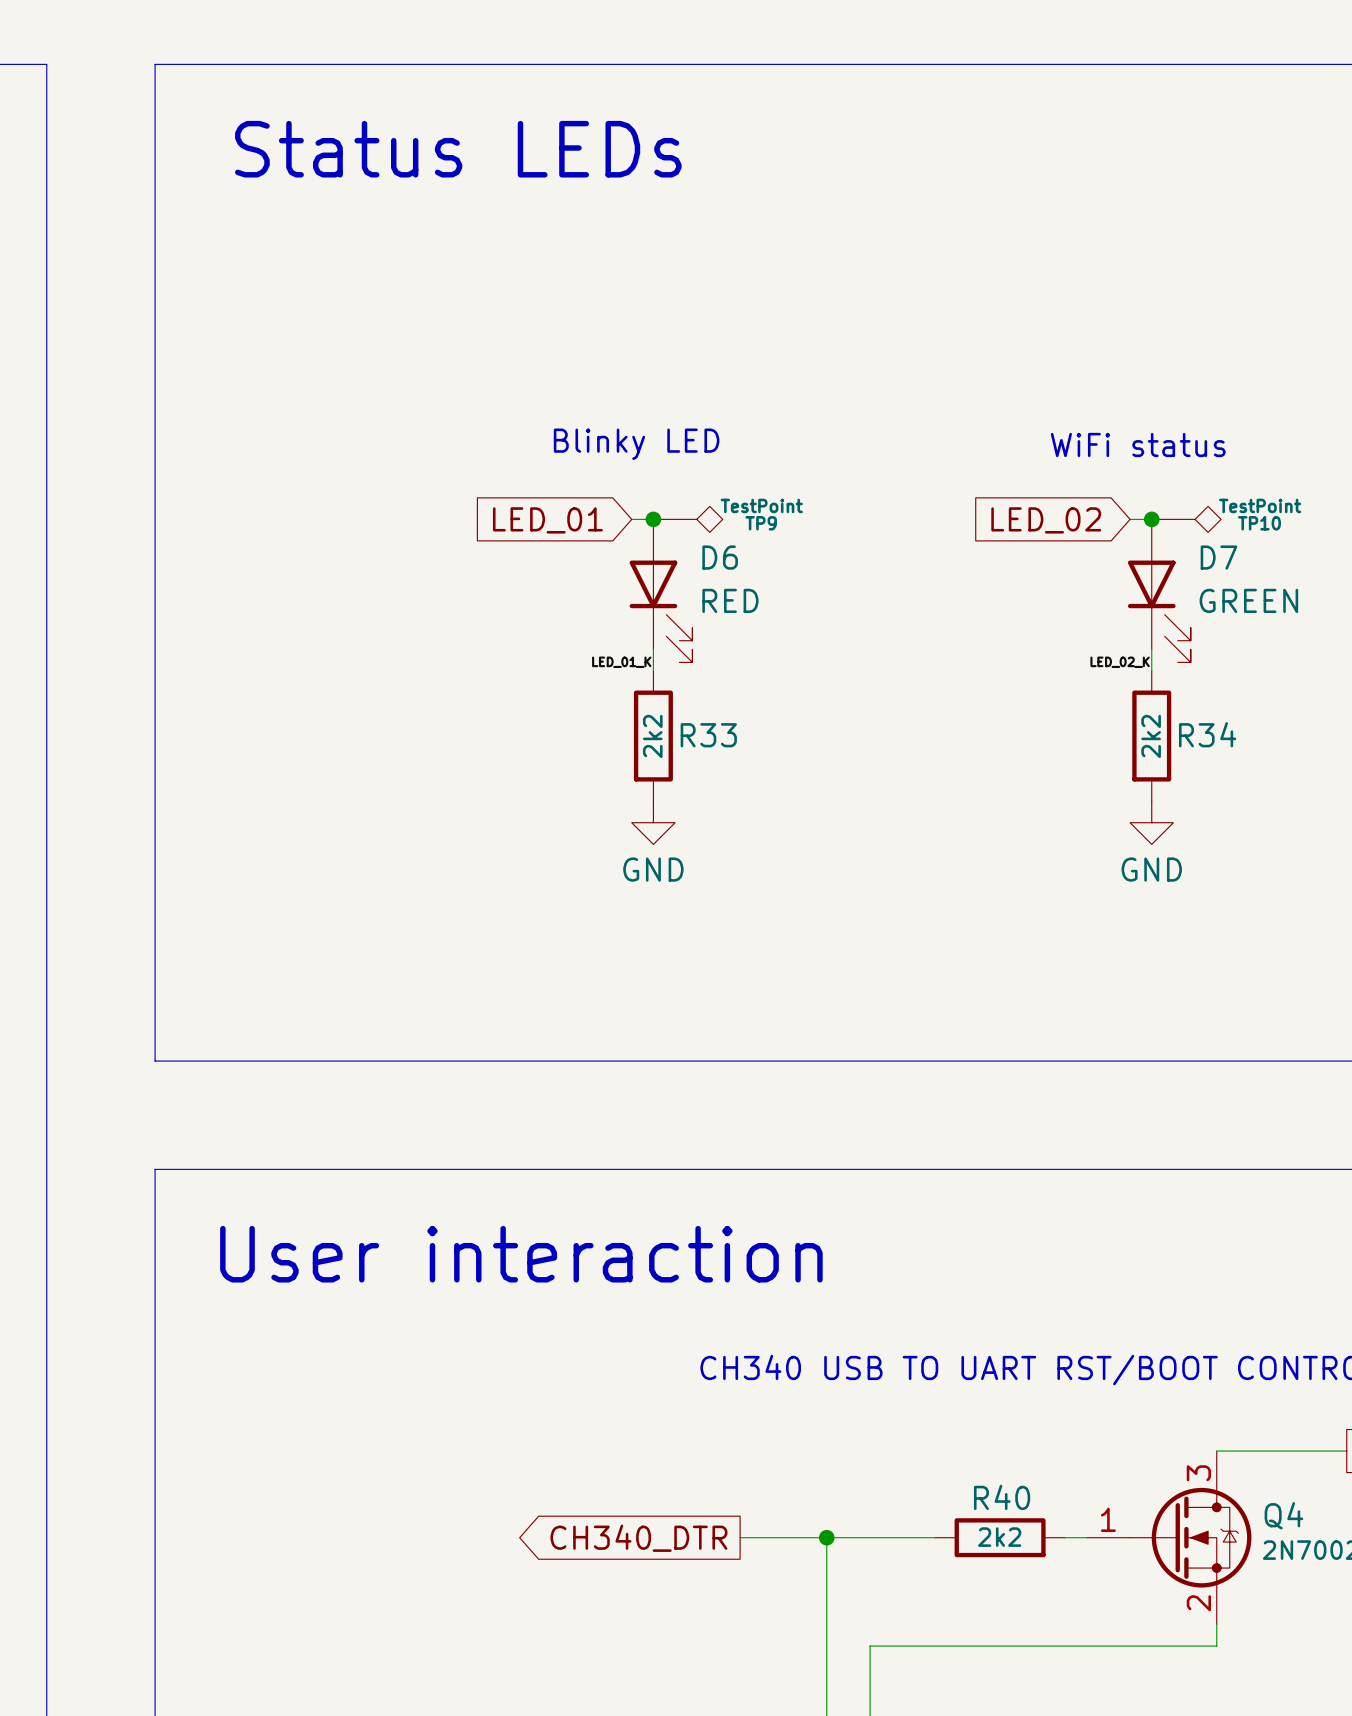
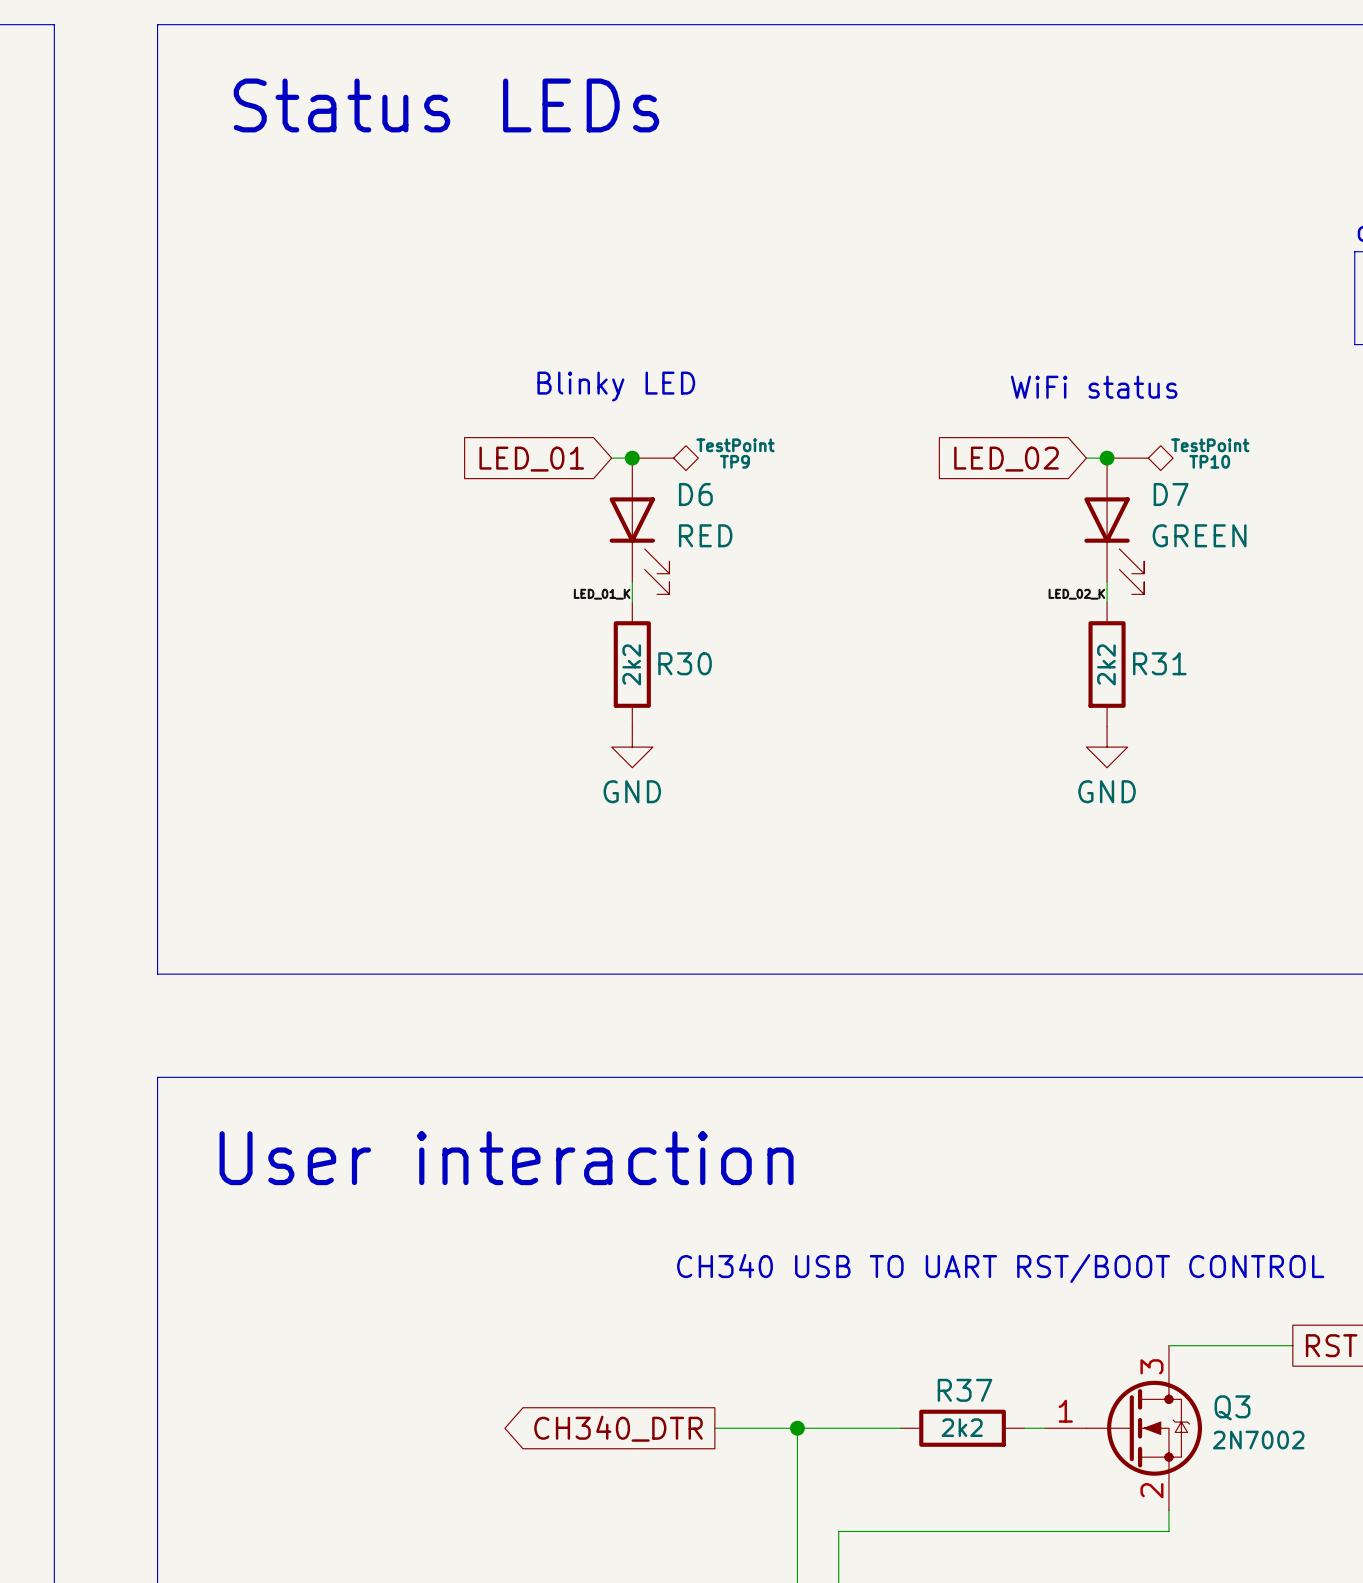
R34 name: R34 (1207, 734) -> R31 (1159, 663)
R33 name: R33 (708, 735) -> R30 (685, 663)
R40 name: R40 (1002, 1497) -> R37 (964, 1390)
Q4 name: Q4 (1283, 1515) -> Q3 (1232, 1407)

